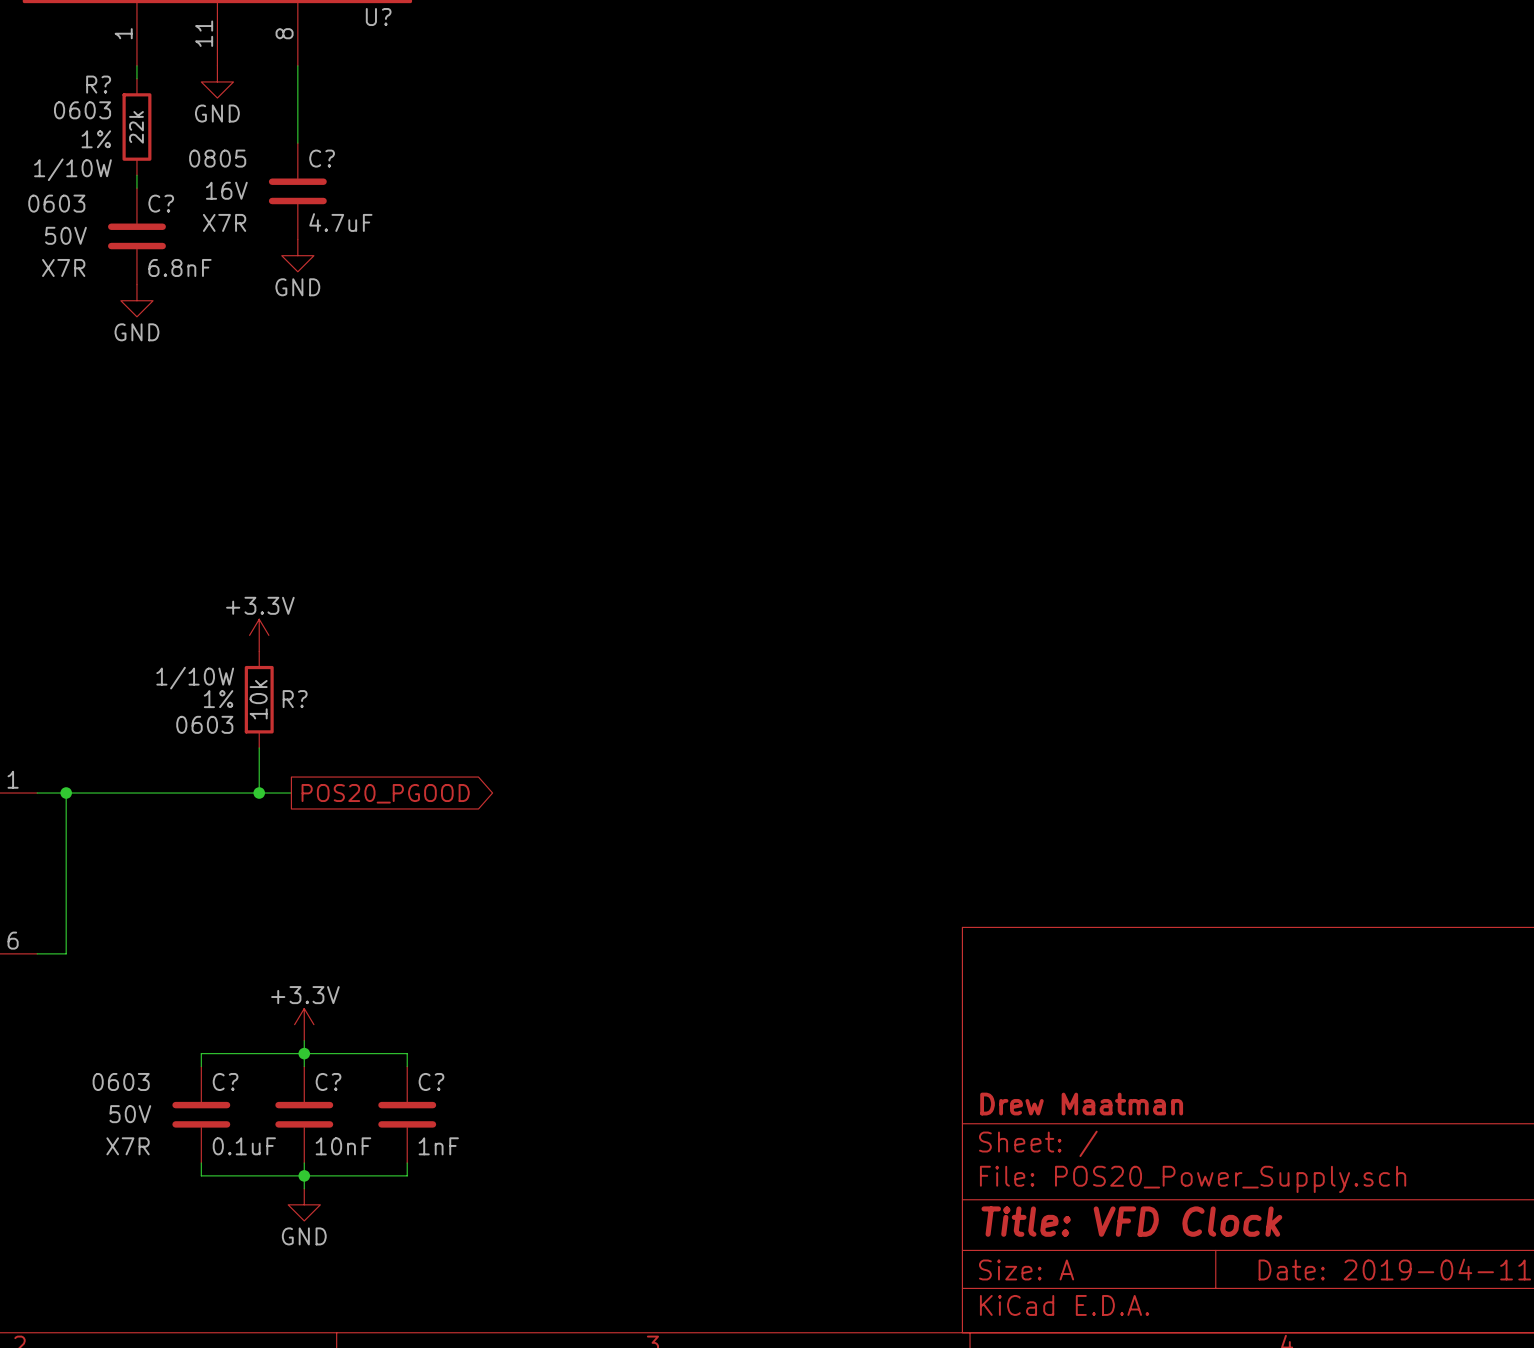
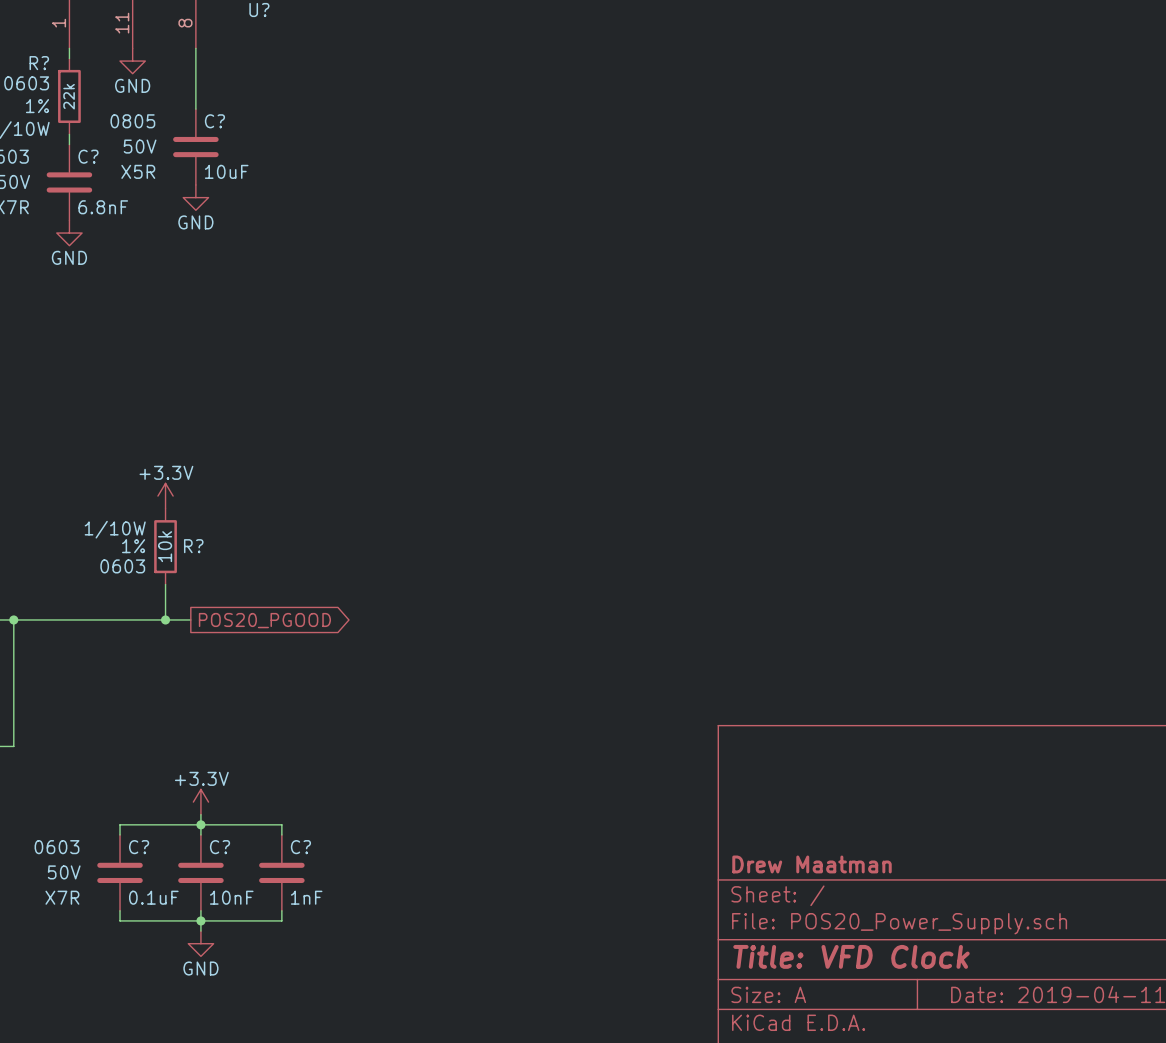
C? text: 16V (226, 190) -> 50V (140, 146)
C? text: X7R (224, 222) -> X5R (138, 171)
C? value: 4.7uF (340, 222) -> 10uF (226, 171)

